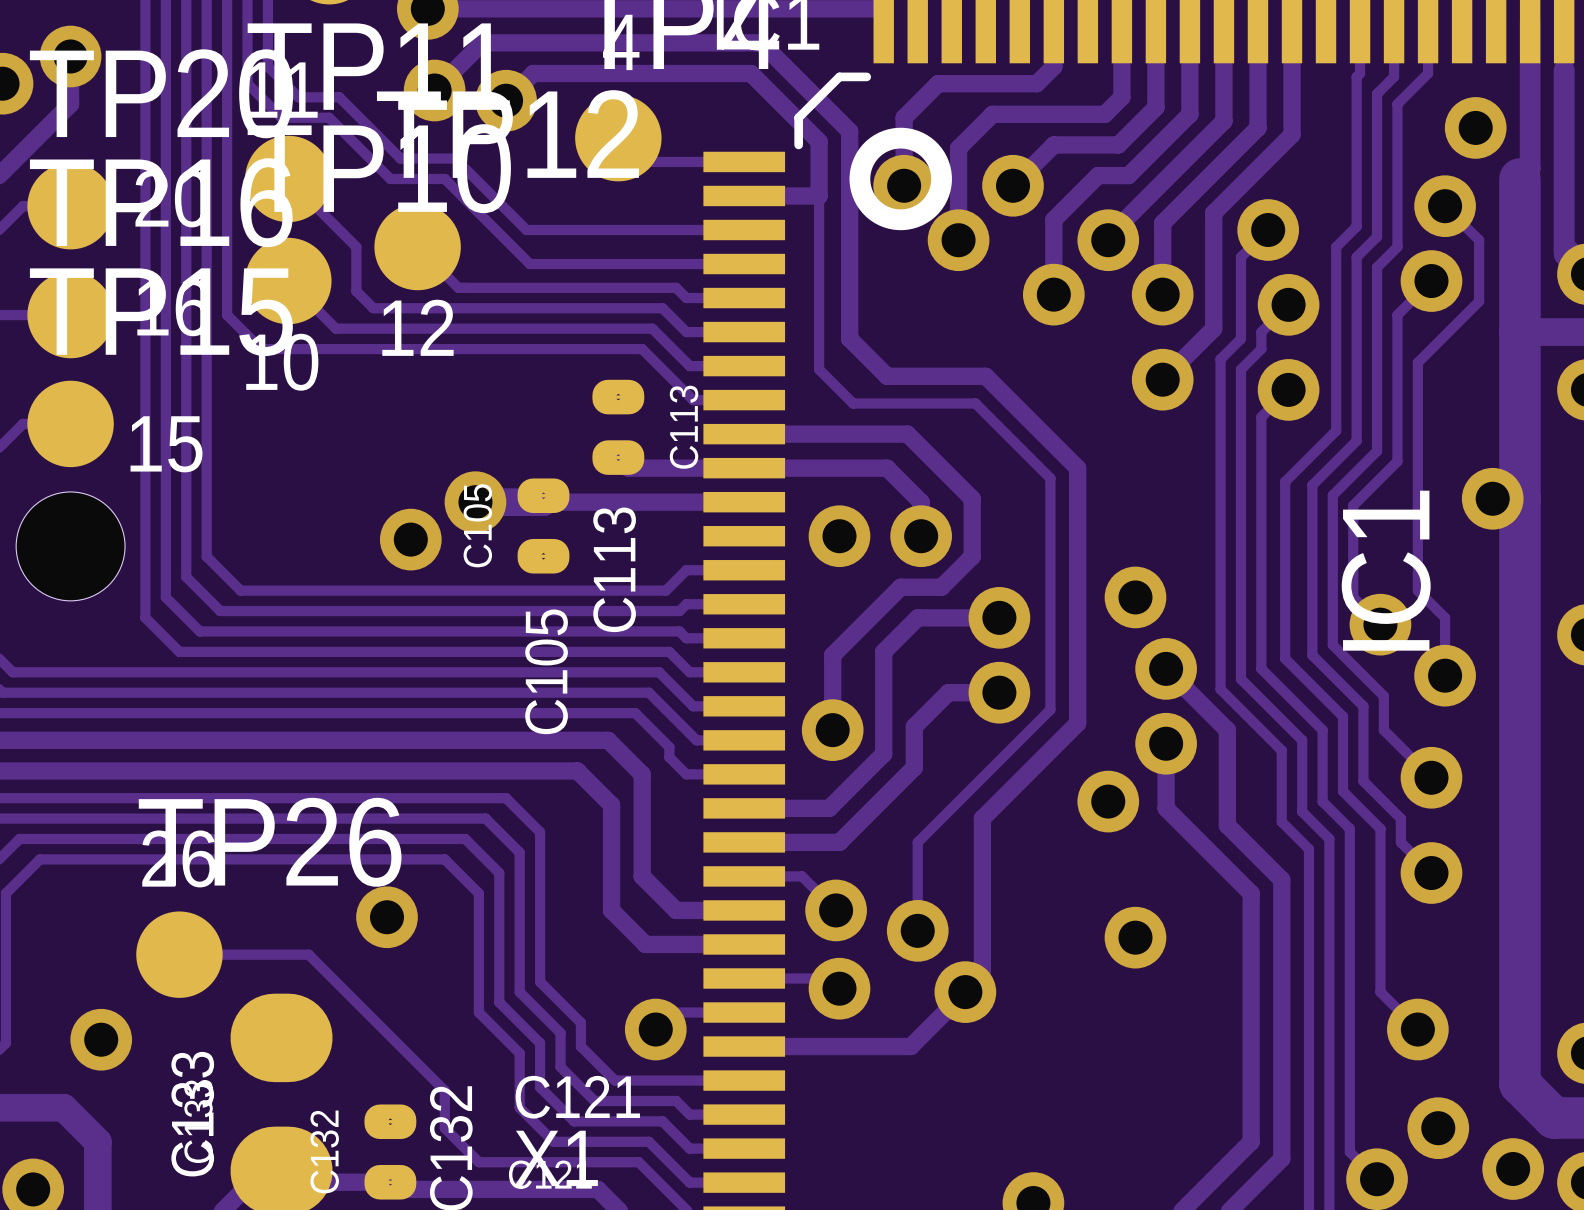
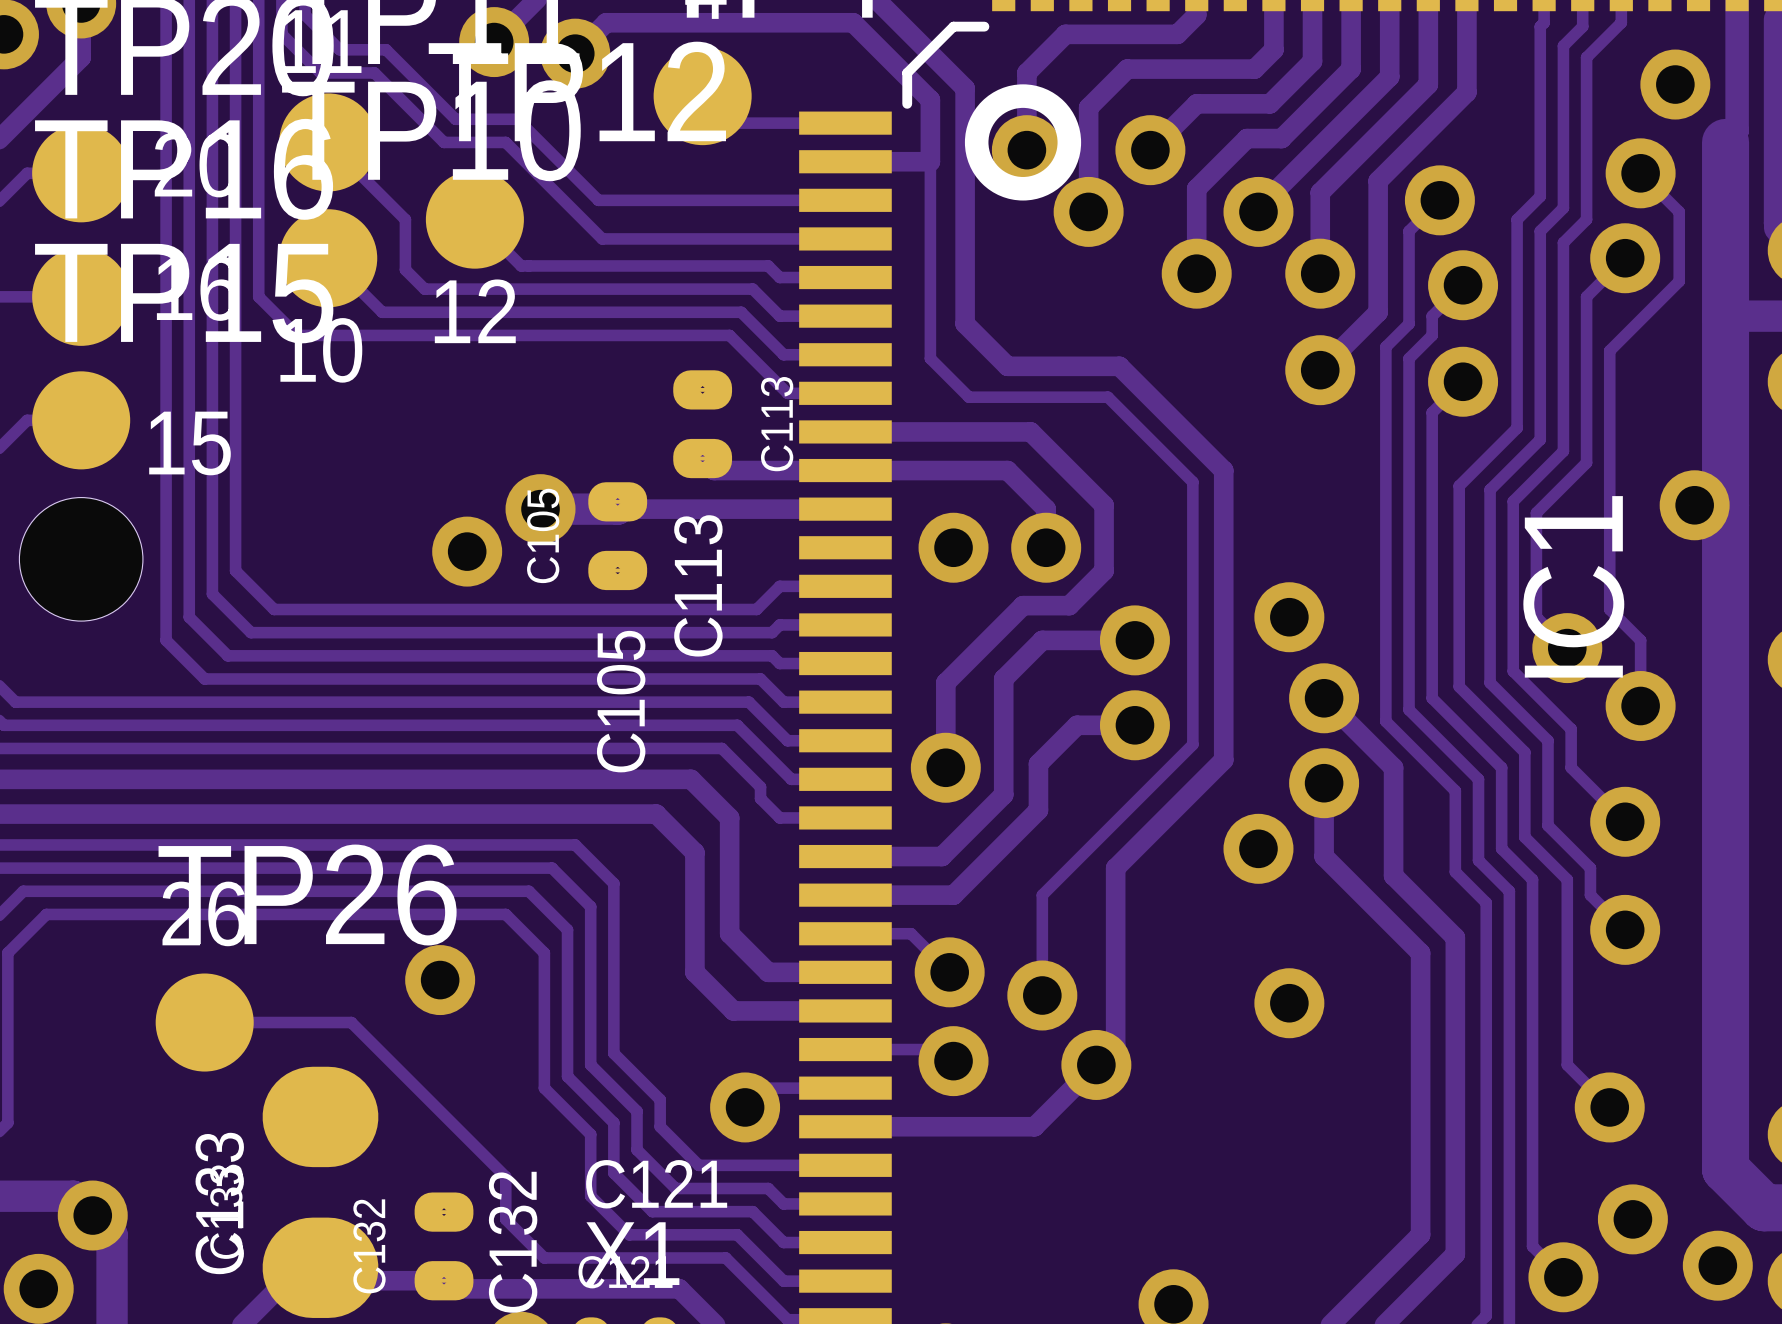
via position: (101, 1039) -> (92, 1215)

